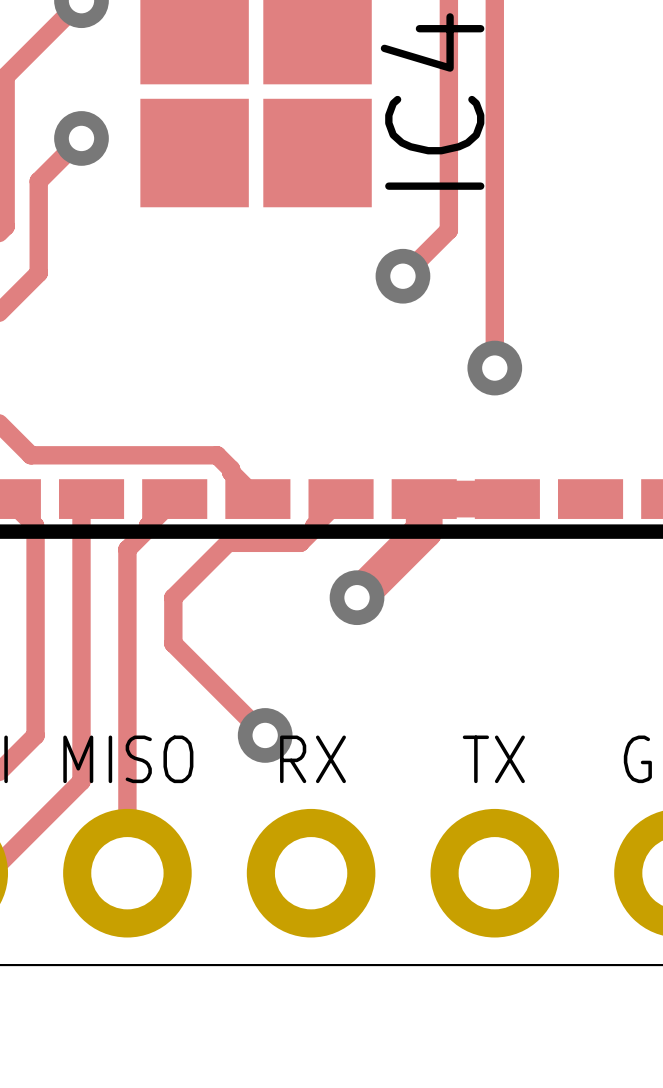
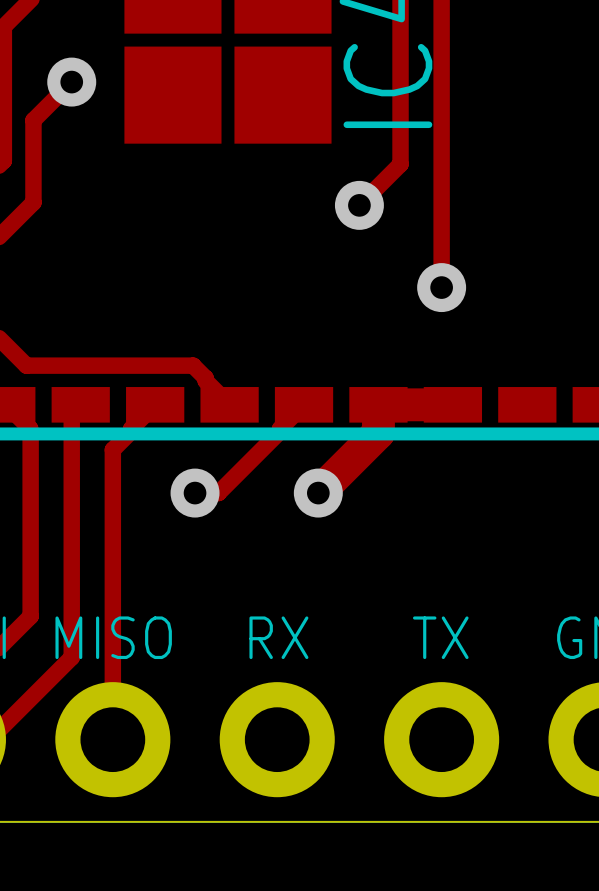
track: (300, 542) (228, 542) (173, 597) (173, 643) (265, 735) -> (267, 443) (218, 493) (195, 493)
via position: (265, 735) -> (195, 493)

